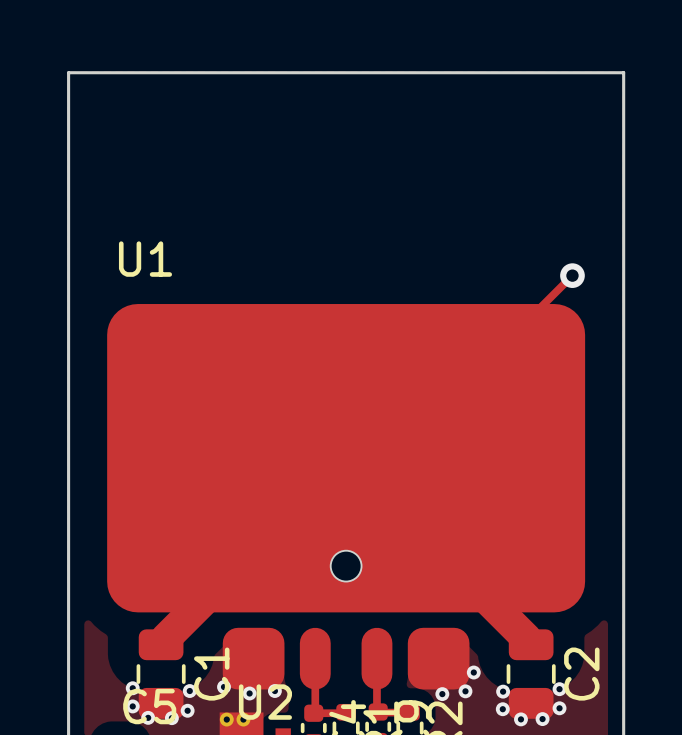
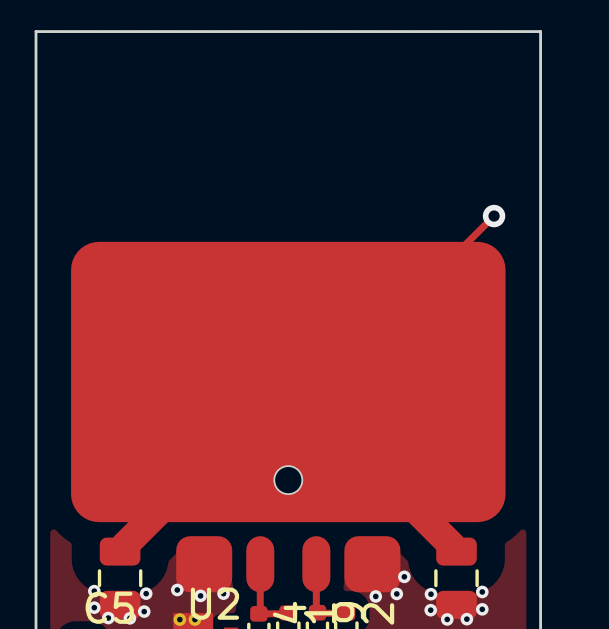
U1 name: U1 (145, 259) -> none
C1 name: C1 (211, 674) -> none
C2 name: C2 (581, 674) -> none

